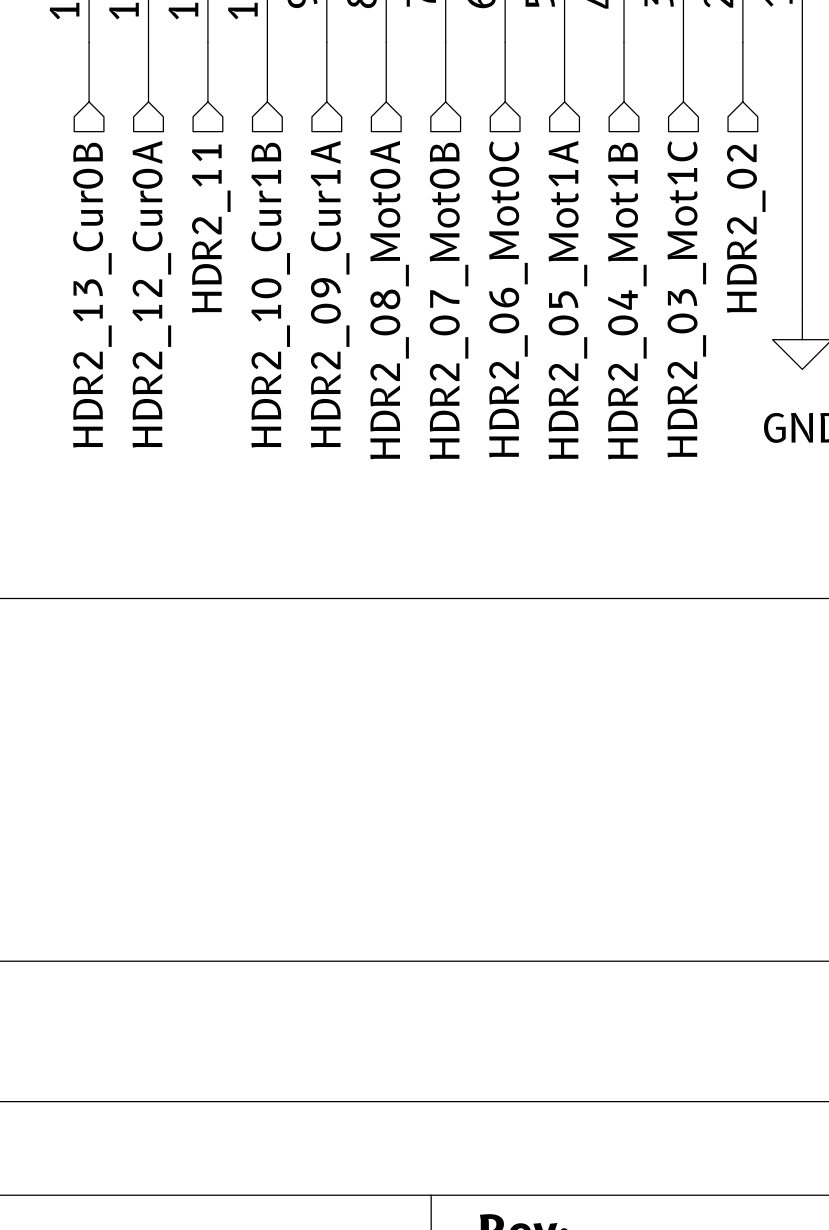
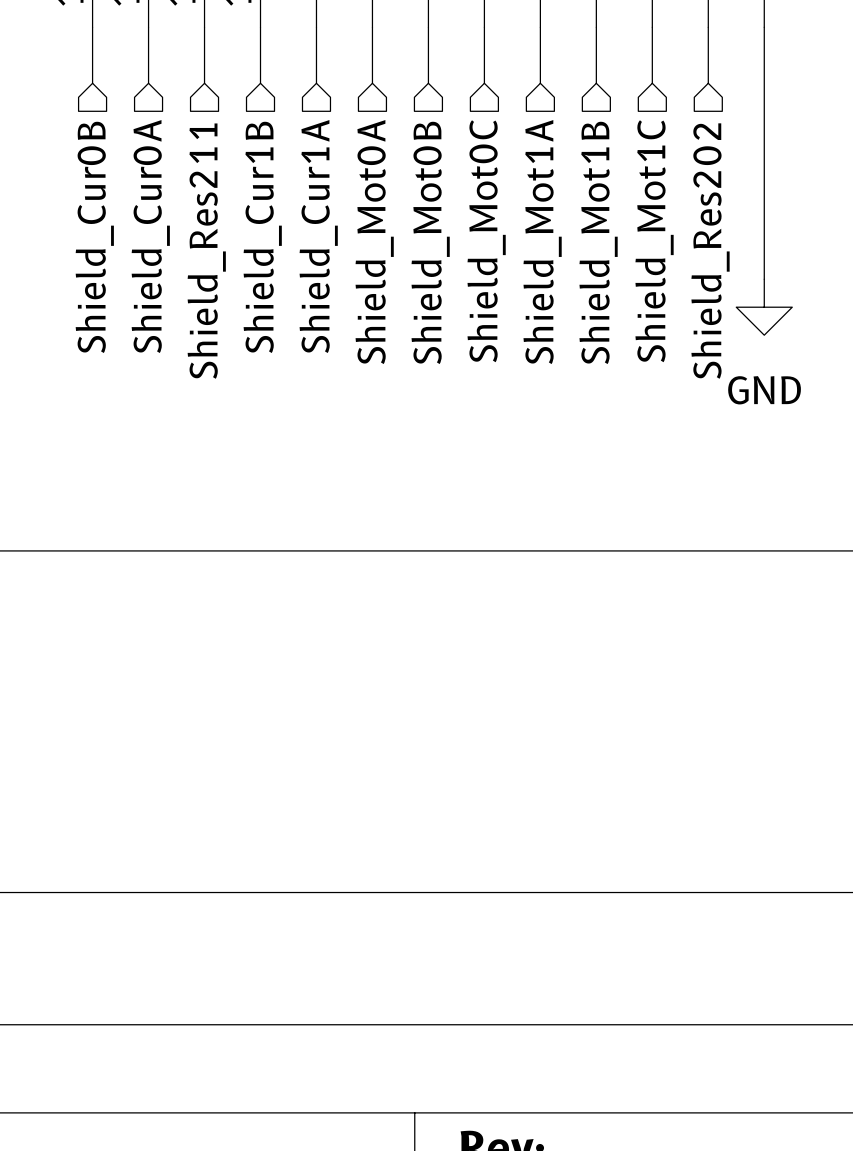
hierarchical label: HDR2_11 (211, 228) -> Shield_Res211 (206, 251)
hierarchical label: HDR2_02 (746, 228) -> Shield_Res202 (710, 251)
hierarchical label: HDR2_12_Cur0A (151, 294) -> Shield_Cur0A (150, 236)
hierarchical label: HDR2_09_Cur1A (330, 294) -> Shield_Cur1A (318, 236)
hierarchical label: HDR2_13_Cur0B (92, 295) -> Shield_Cur0B (94, 237)
hierarchical label: HDR2_10_Cur1B (270, 295) -> Shield_Cur1B (262, 237)
hierarchical label: HDR2_06_Mot0C (508, 299) -> Shield_Mot0C (486, 241)
hierarchical label: HDR2_03_Mot1C (686, 299) -> Shield_Mot1C (654, 241)
hierarchical label: HDR2_08_Mot0A (389, 300) -> Shield_Mot0A (374, 242)
hierarchical label: HDR2_05_Mot1A (567, 300) -> Shield_Mot1A (542, 242)
hierarchical label: HDR2_07_Mot0B (449, 301) -> Shield_Mot0B (430, 242)
hierarchical label: HDR2_04_Mot1B (627, 301) -> Shield_Mot1B (598, 242)

